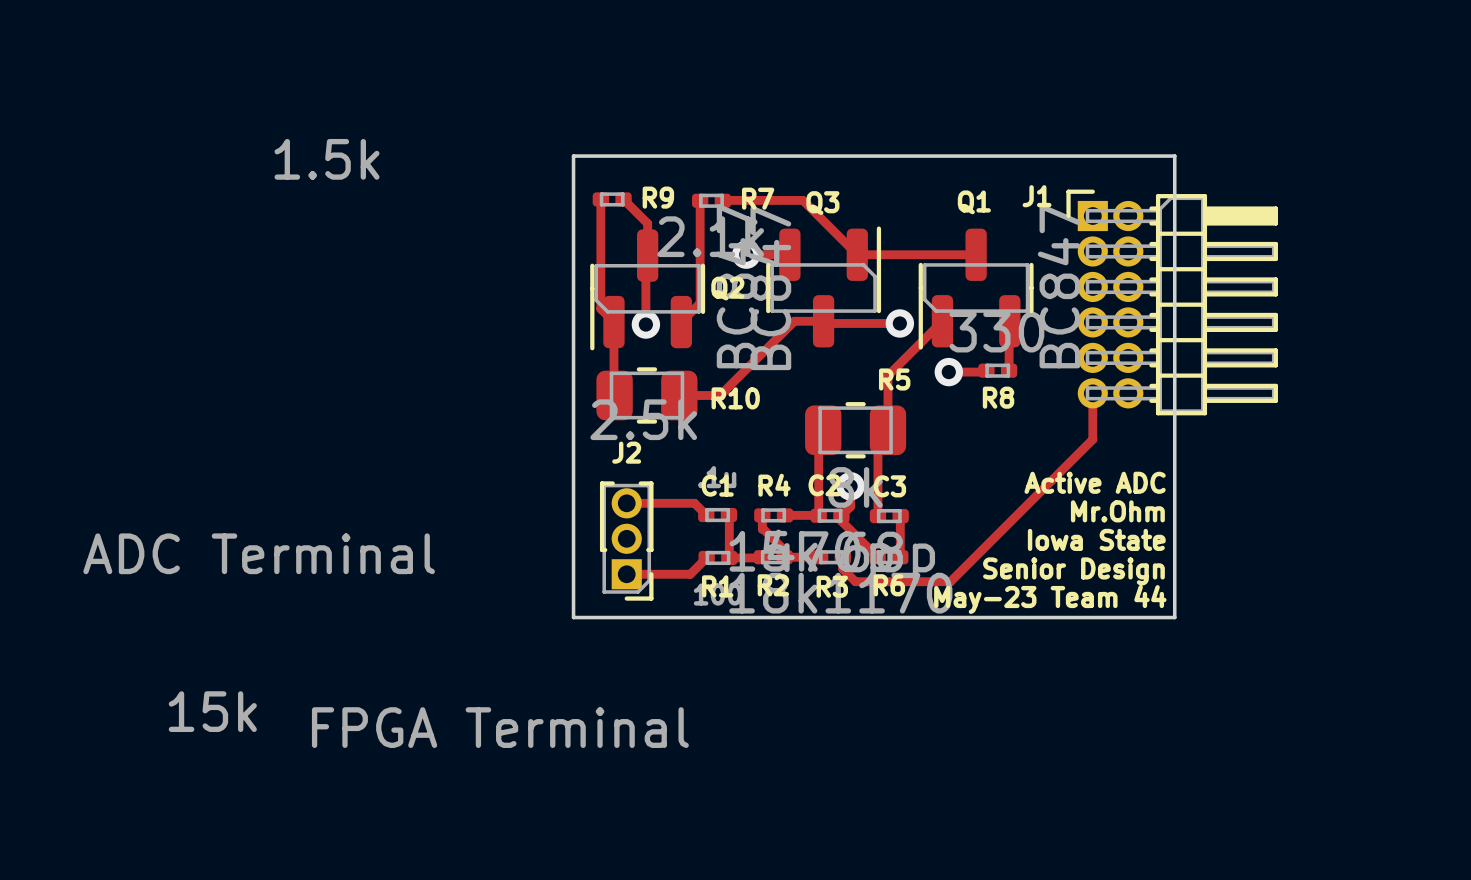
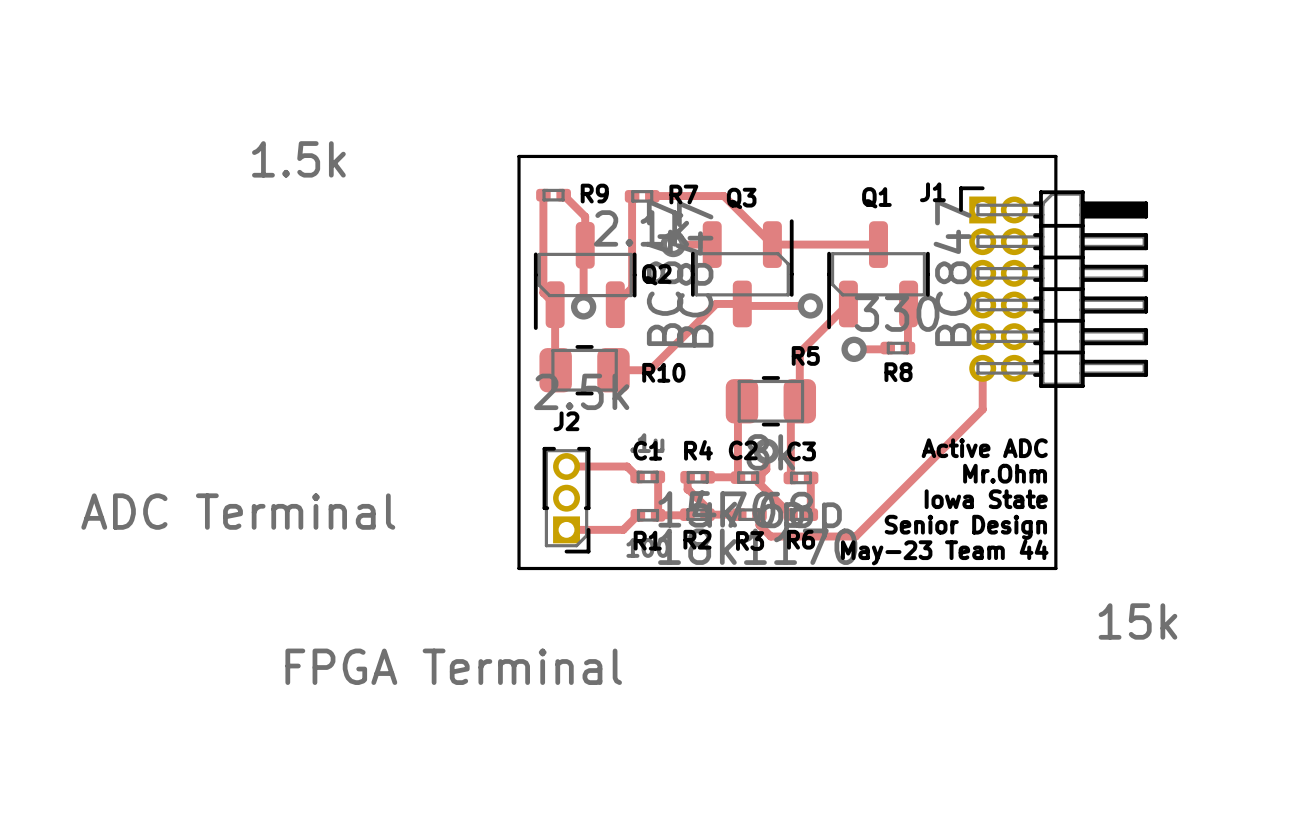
R3 value position: 15k (212, 711) -> 15k (1137, 621)

